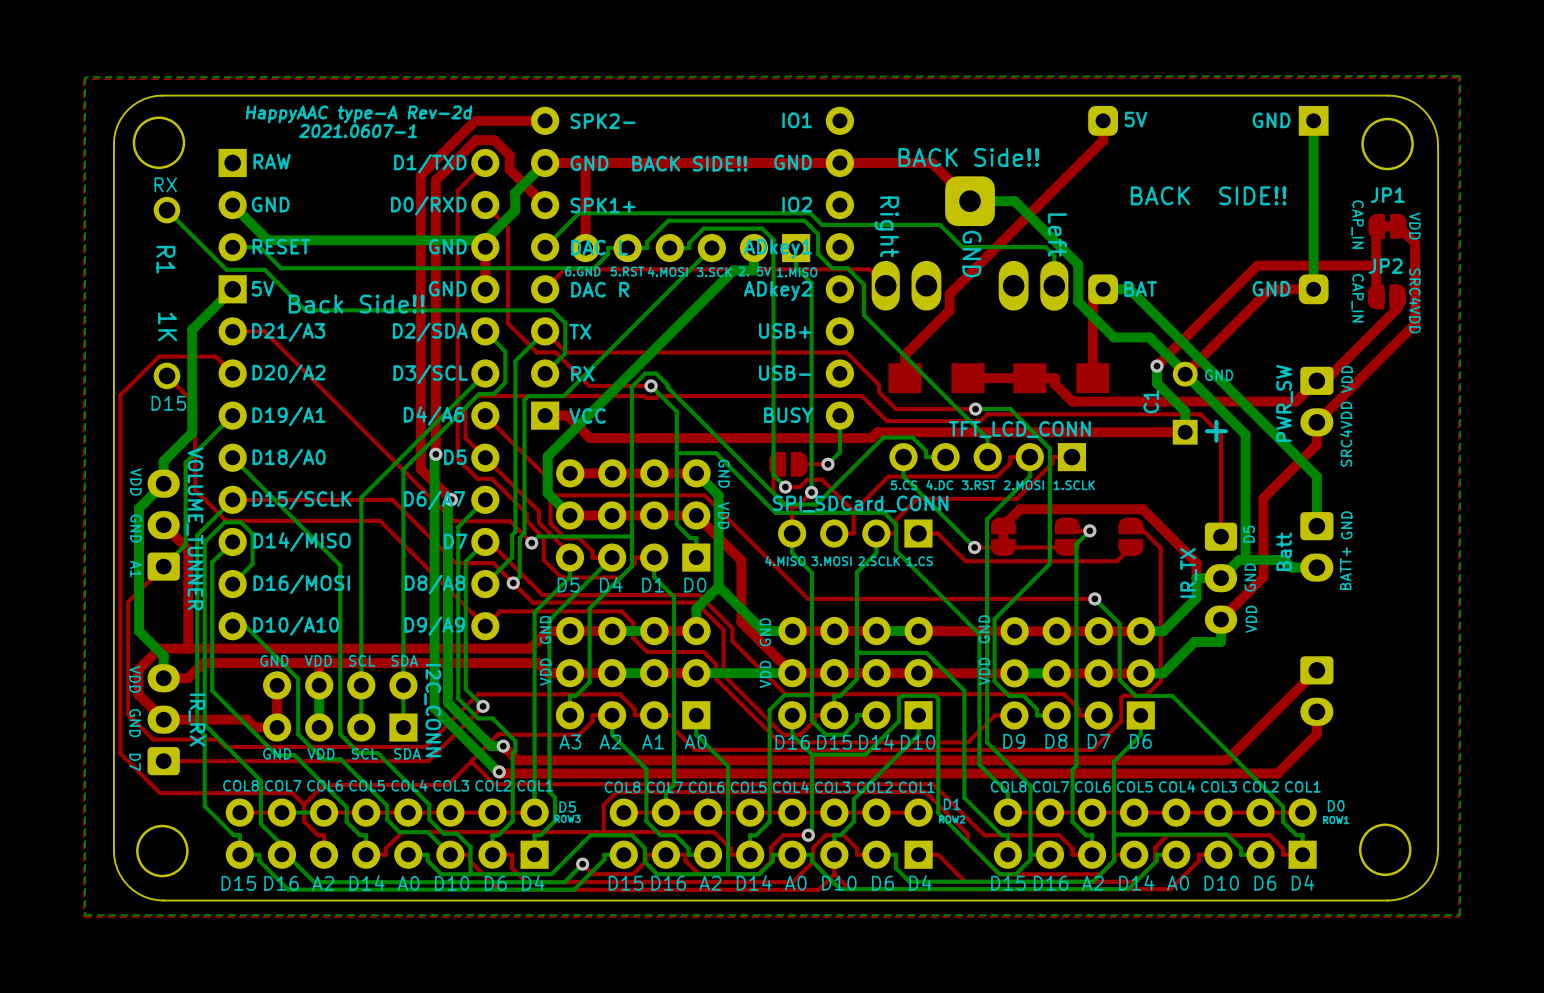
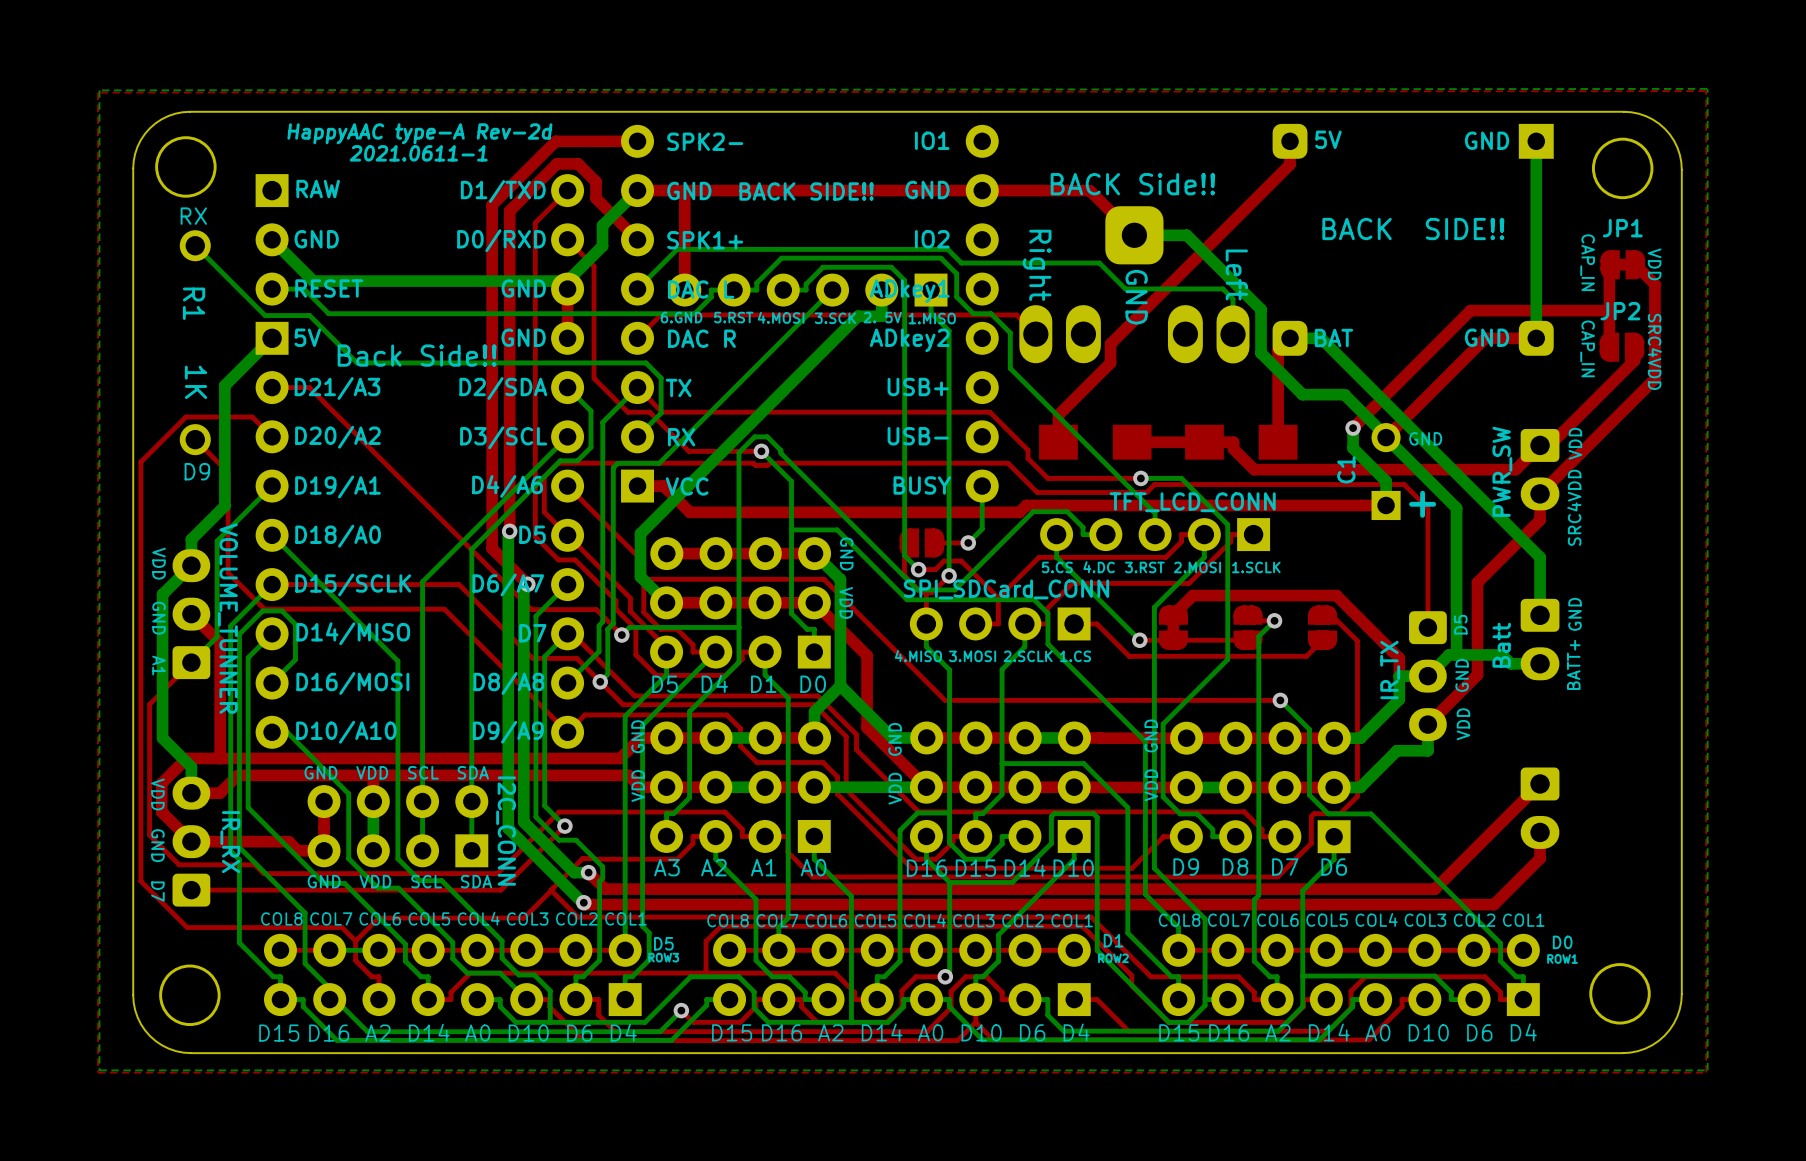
text: 2021.0607-1 (358, 131) -> 2021.0611-1 (418, 153)
text: D15 (168, 403) -> D9 (197, 471)

